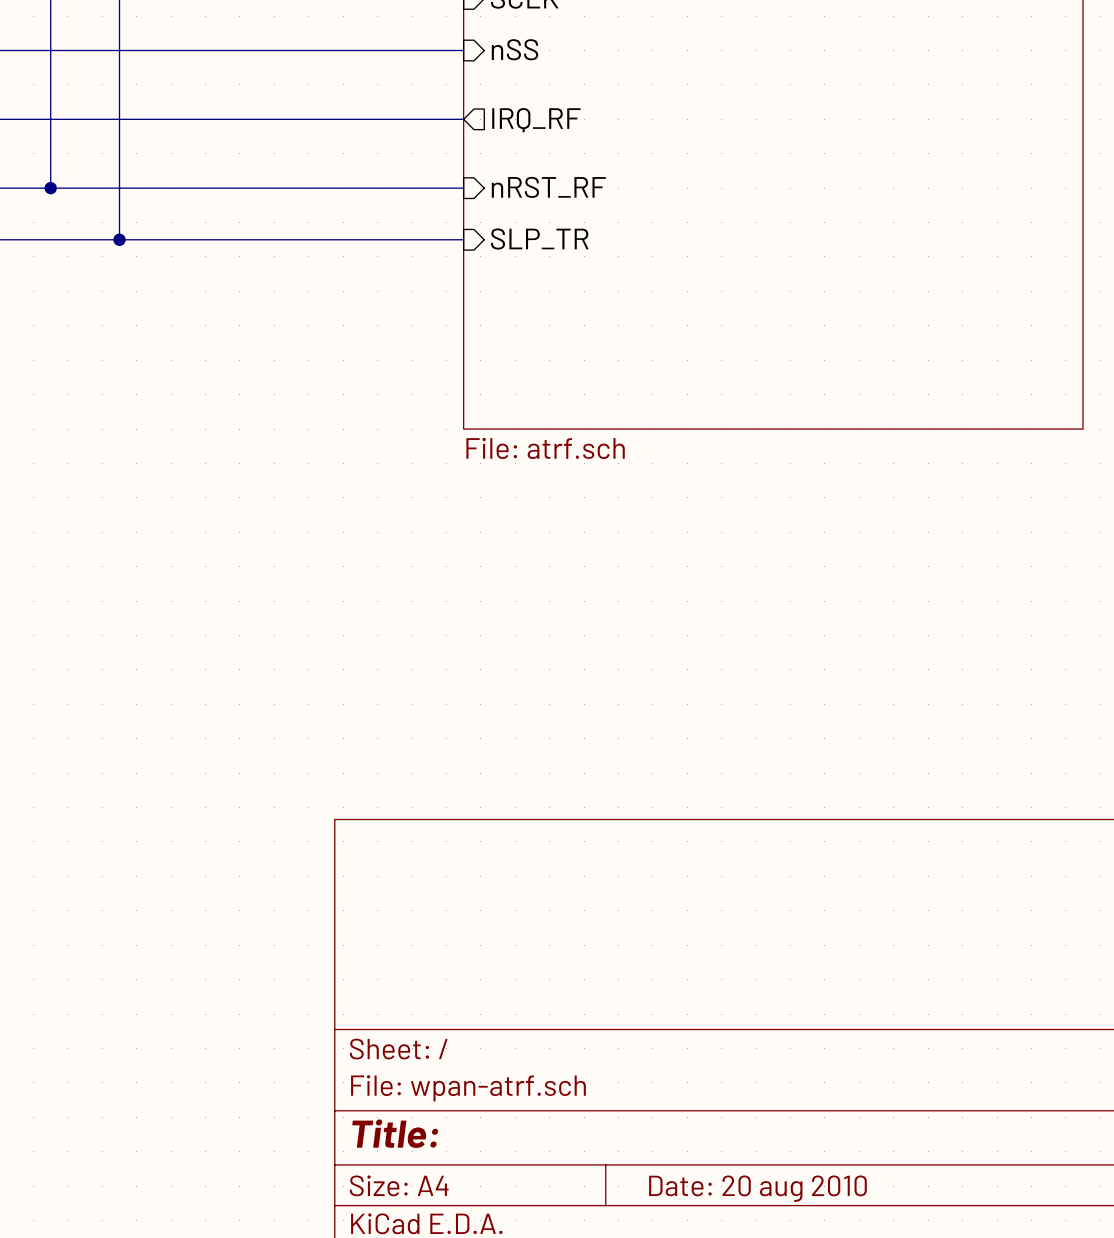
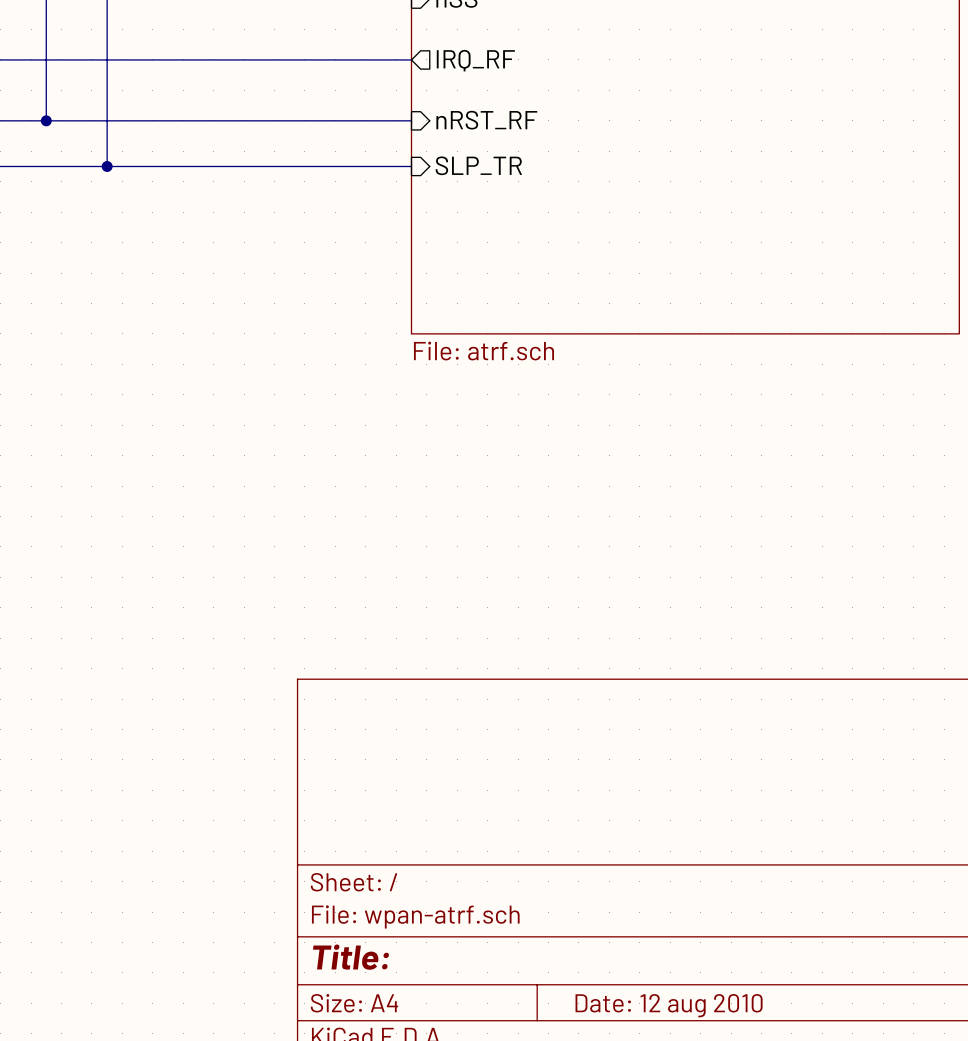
title block: Date: 20 aug 2010 (757, 1188) -> Date: 12 aug 2010 (669, 1005)

